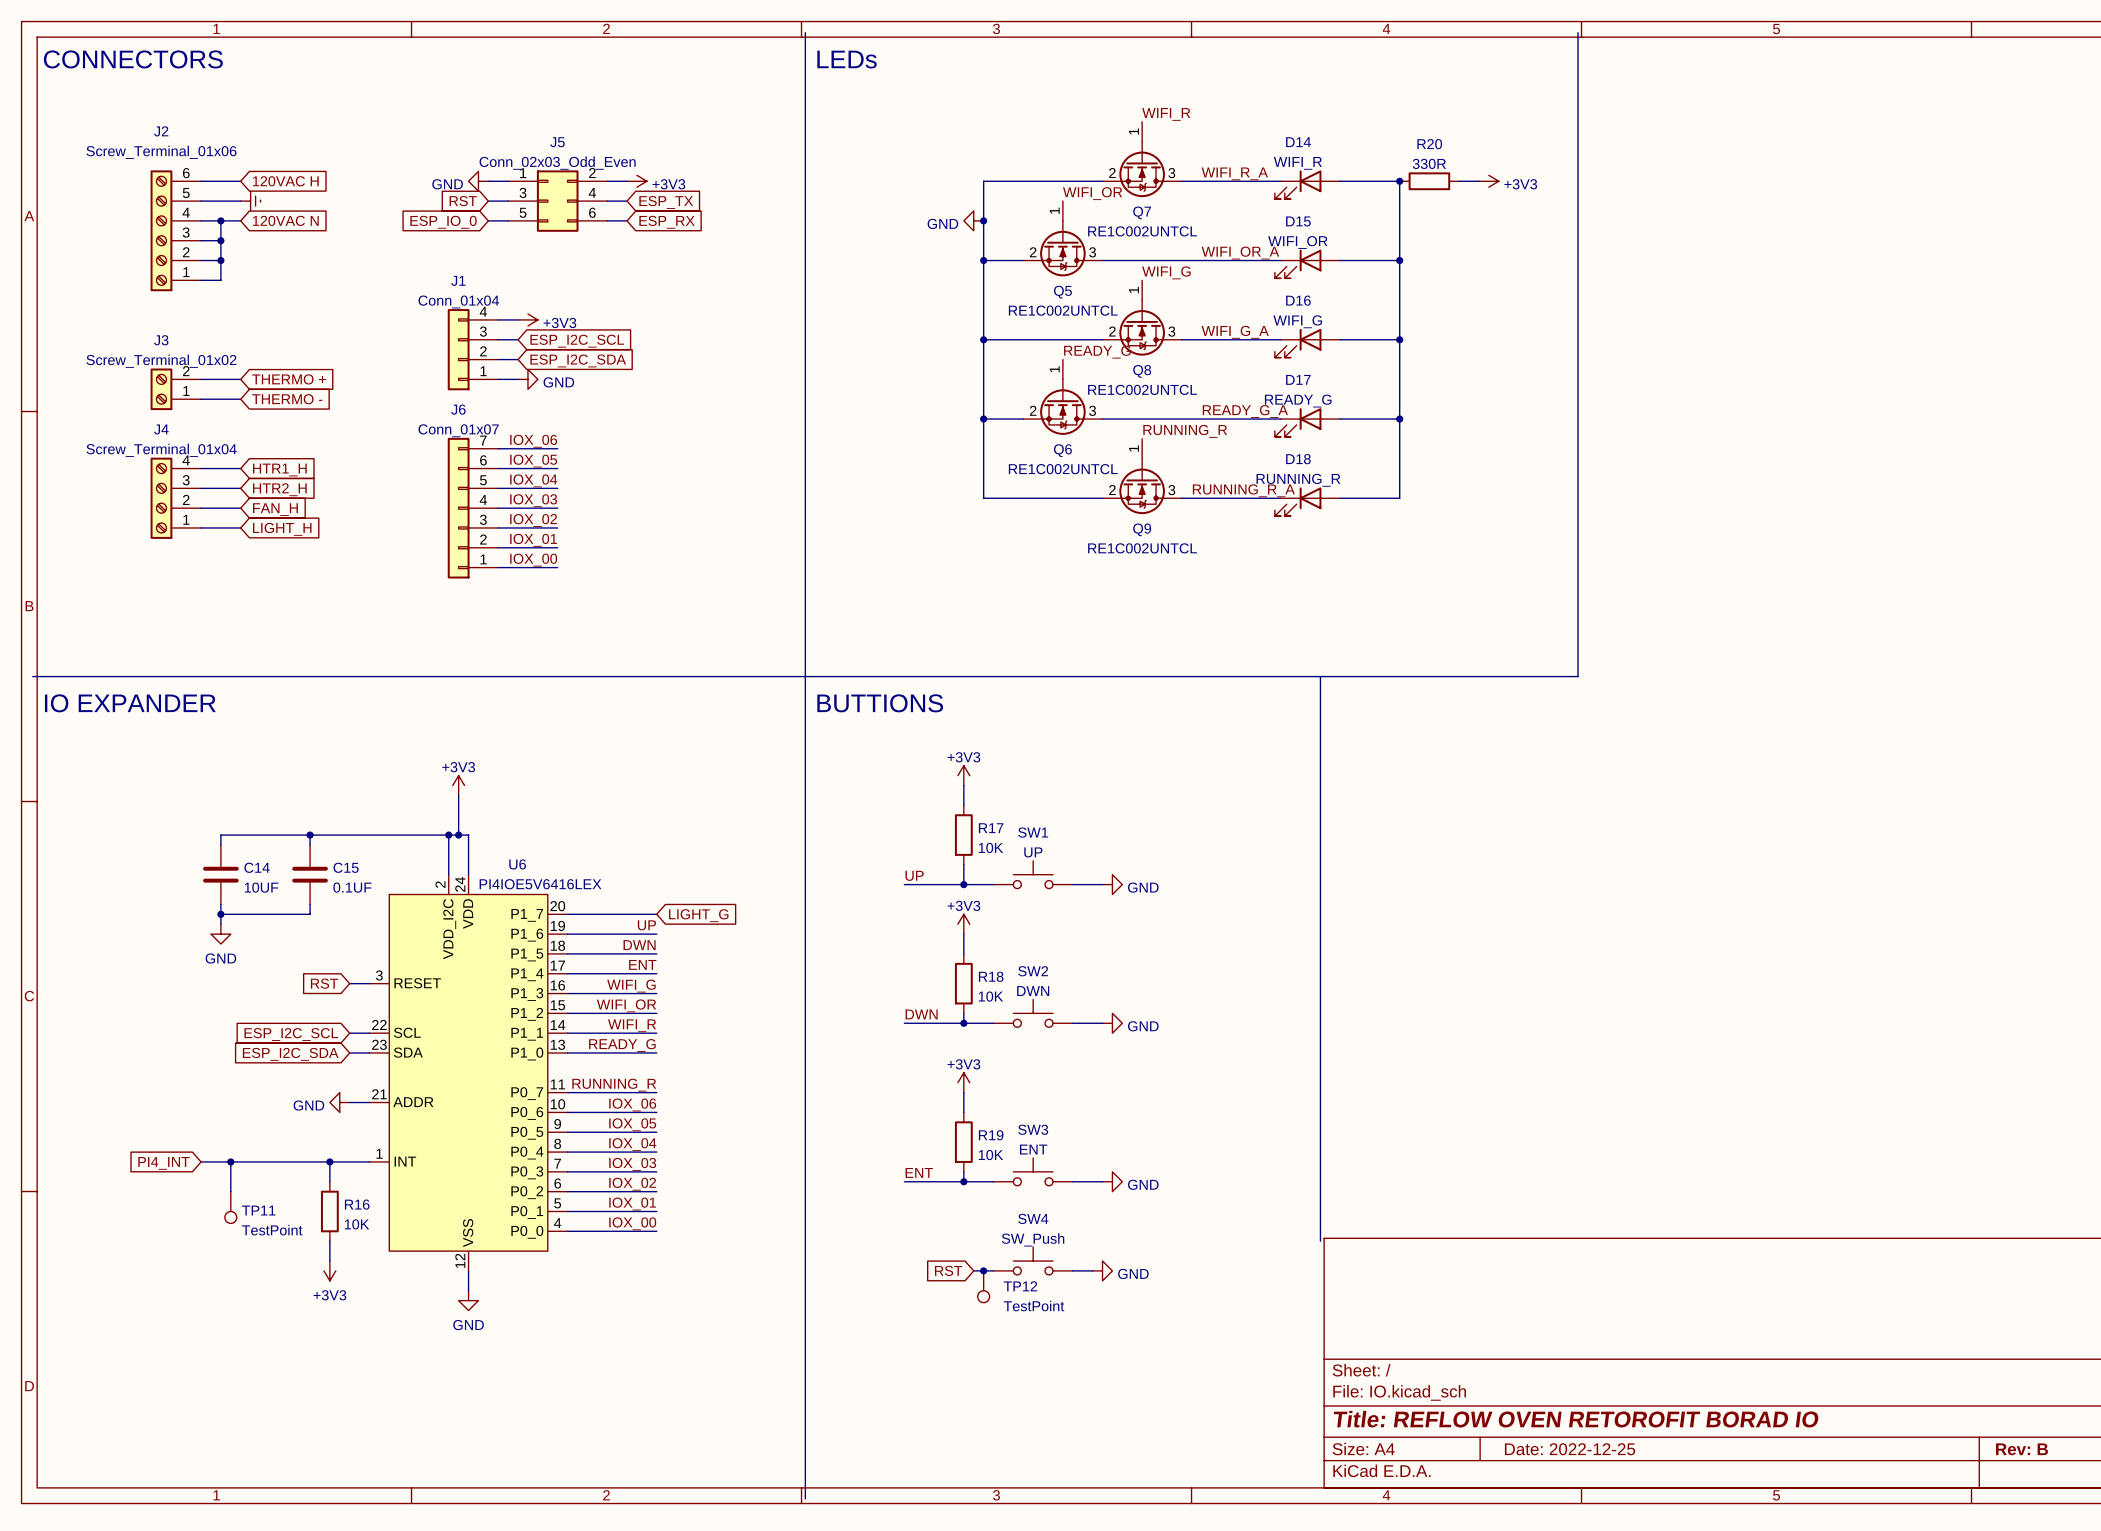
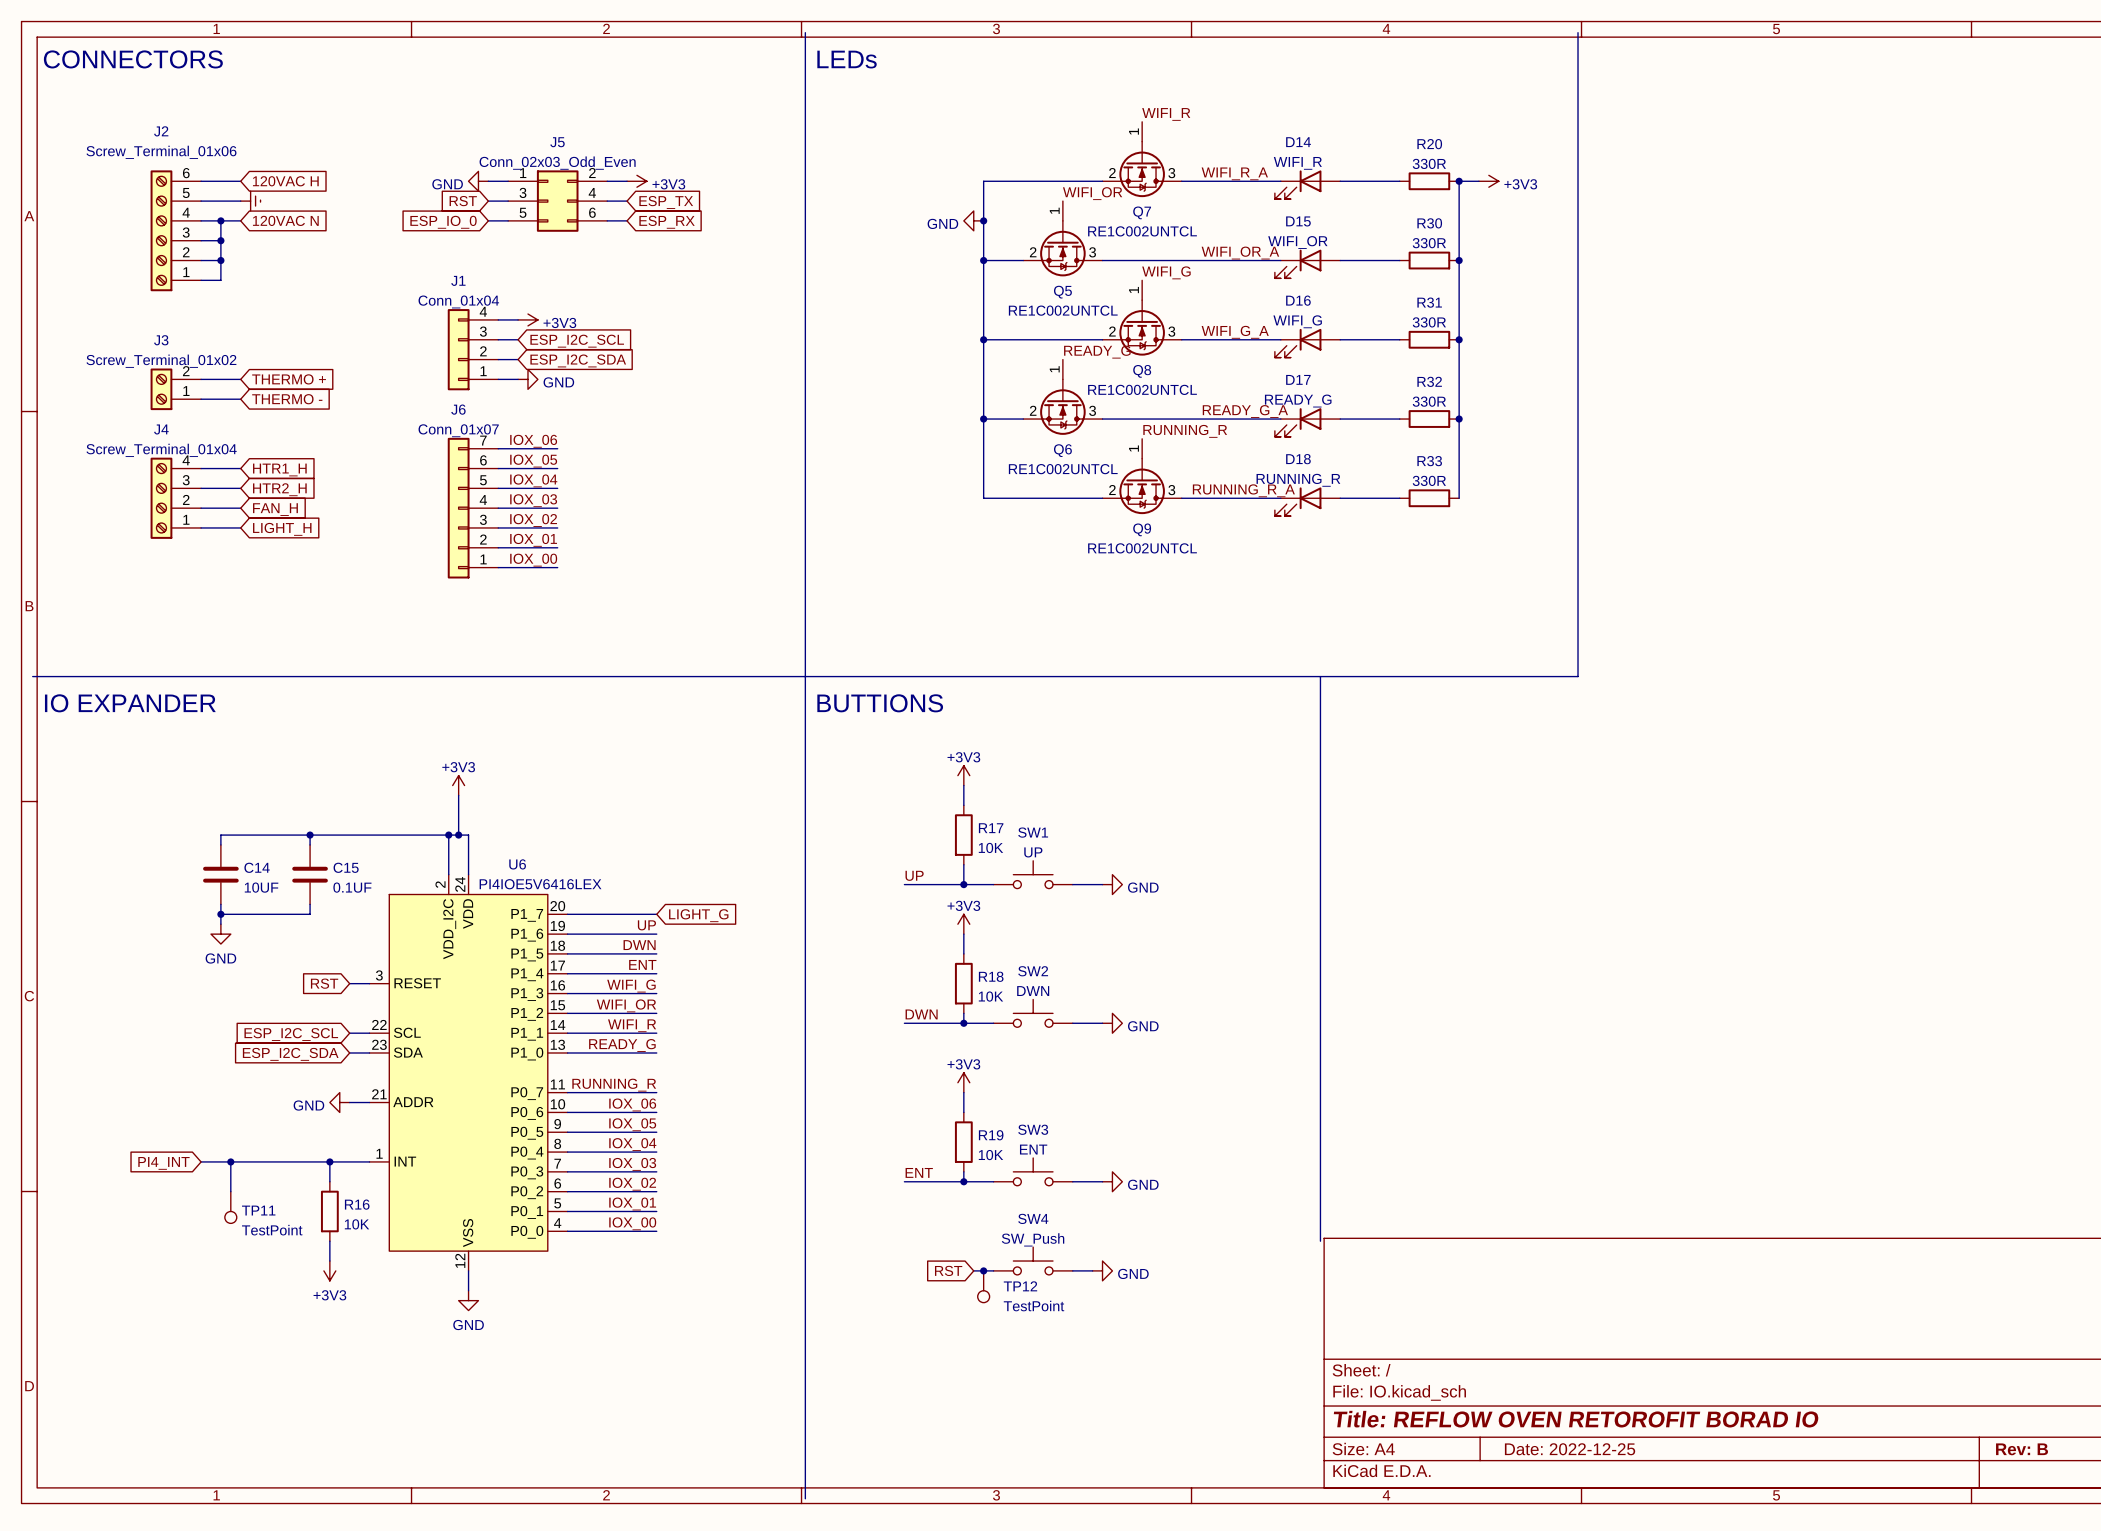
wire: (1399, 181) (1399, 498) -> (1459, 181) (1459, 498)
junction: (1399, 181) -> none
junction: none -> (1459, 181)
junction: (1399, 260) -> none
R30: none -> 330R (1429, 260)
junction: none -> (1459, 260)
junction: (1399, 339) -> none
R31: none -> 330R (1429, 339)
junction: none -> (1459, 339)
junction: (1399, 419) -> none
R32: none -> 330R (1429, 419)
junction: none -> (1459, 419)
R33: none -> 330R (1429, 498)

